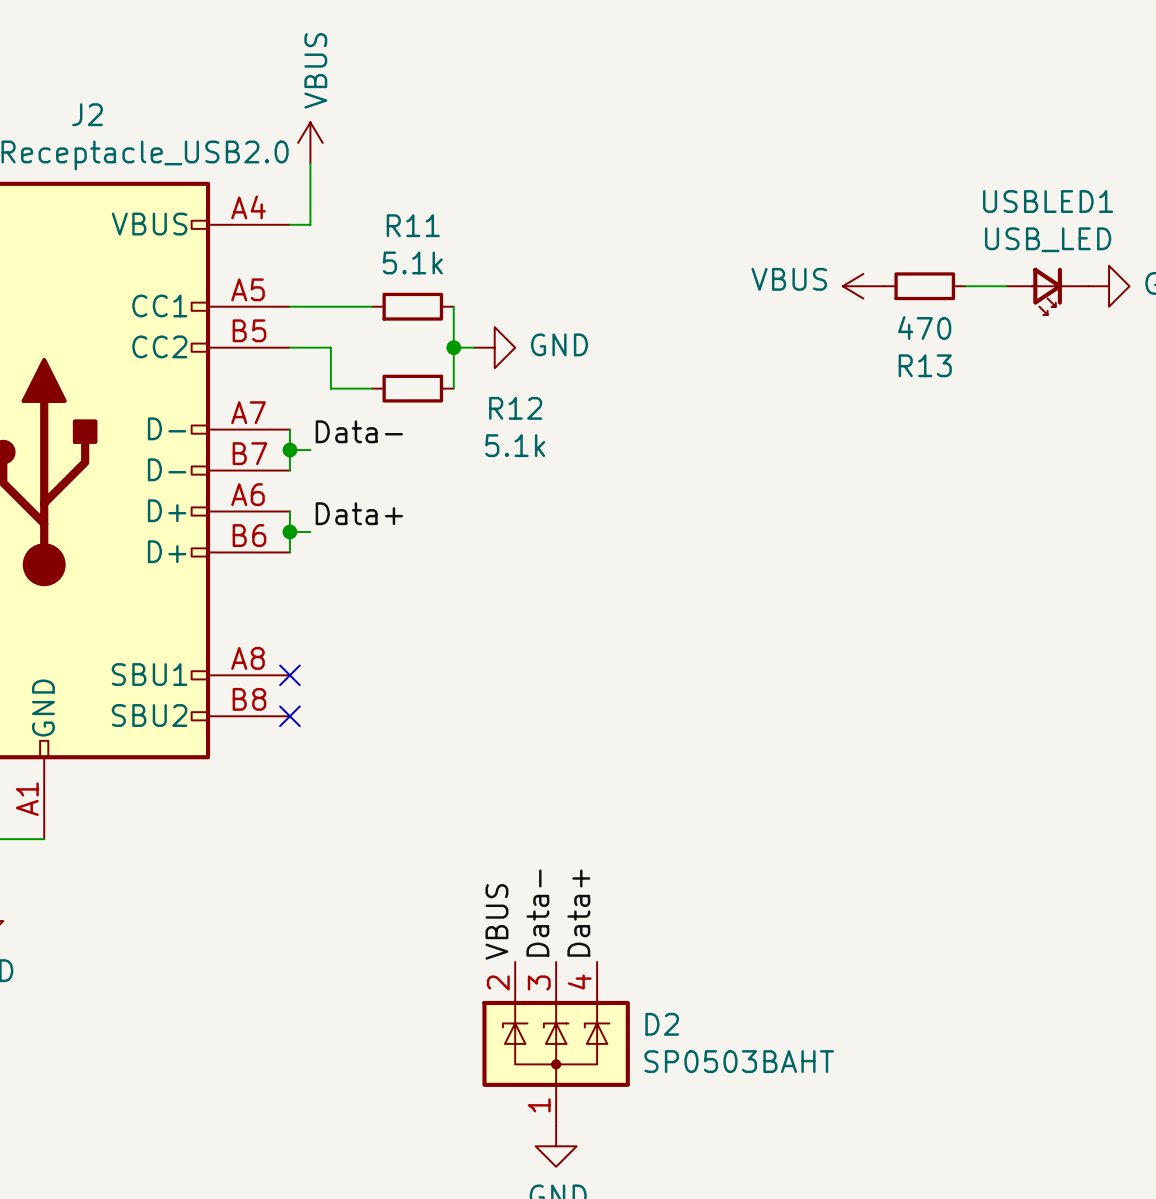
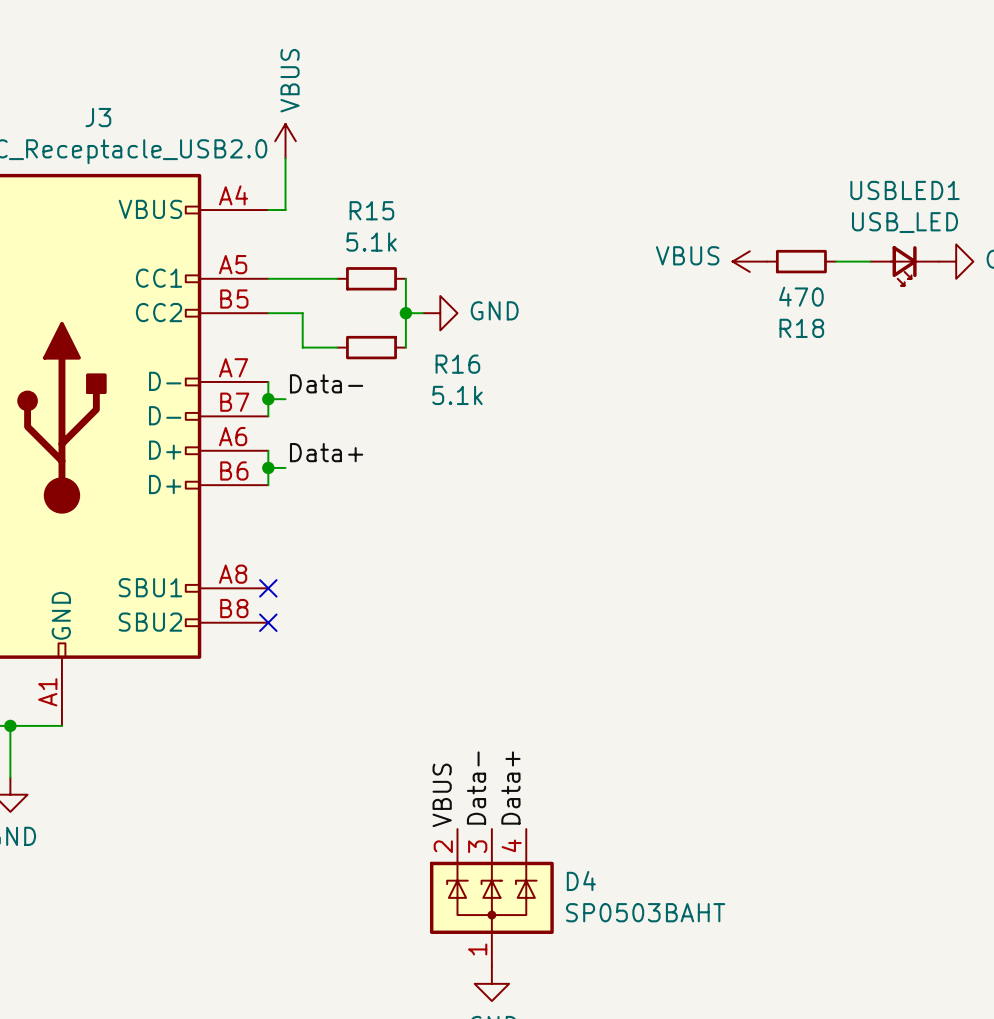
J2 name: J2 (87, 114) -> J3 (98, 117)
R11 name: R11 (413, 225) -> R15 (371, 210)
R13 name: R13 (925, 365) -> R18 (801, 328)
R12 name: R12 (515, 408) -> R16 (457, 364)
D2 name: D2 (662, 1024) -> D4 (581, 881)

